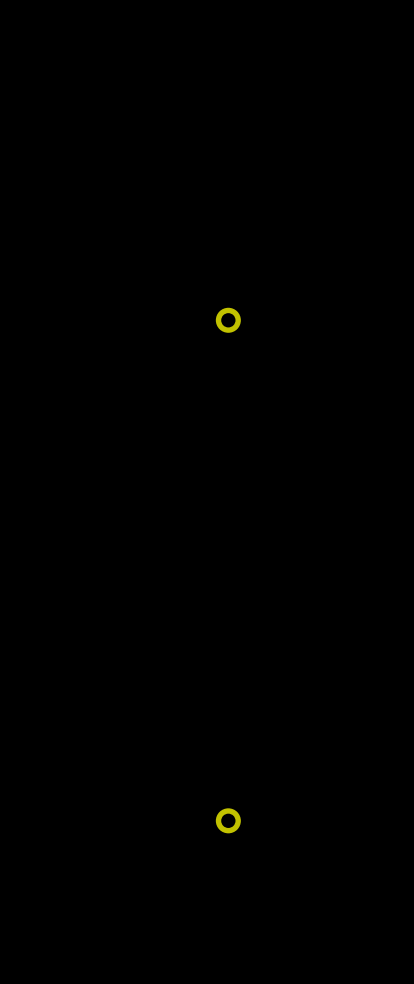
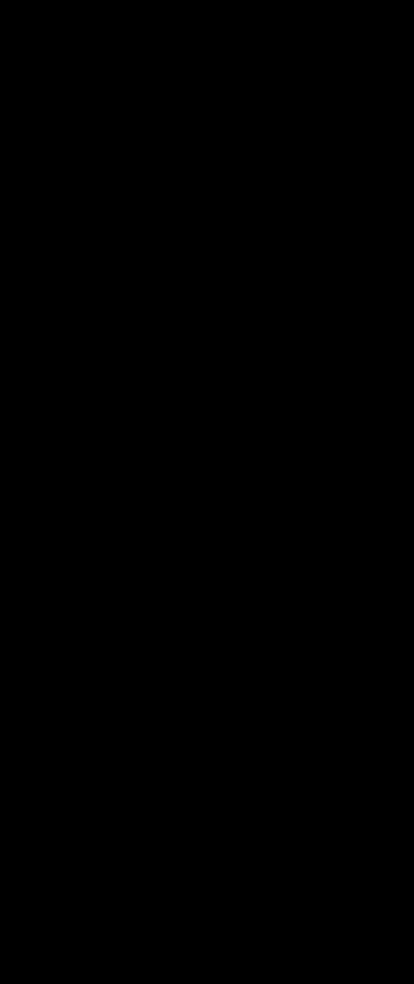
part: (228, 320) -> none
part: (228, 820) -> none

